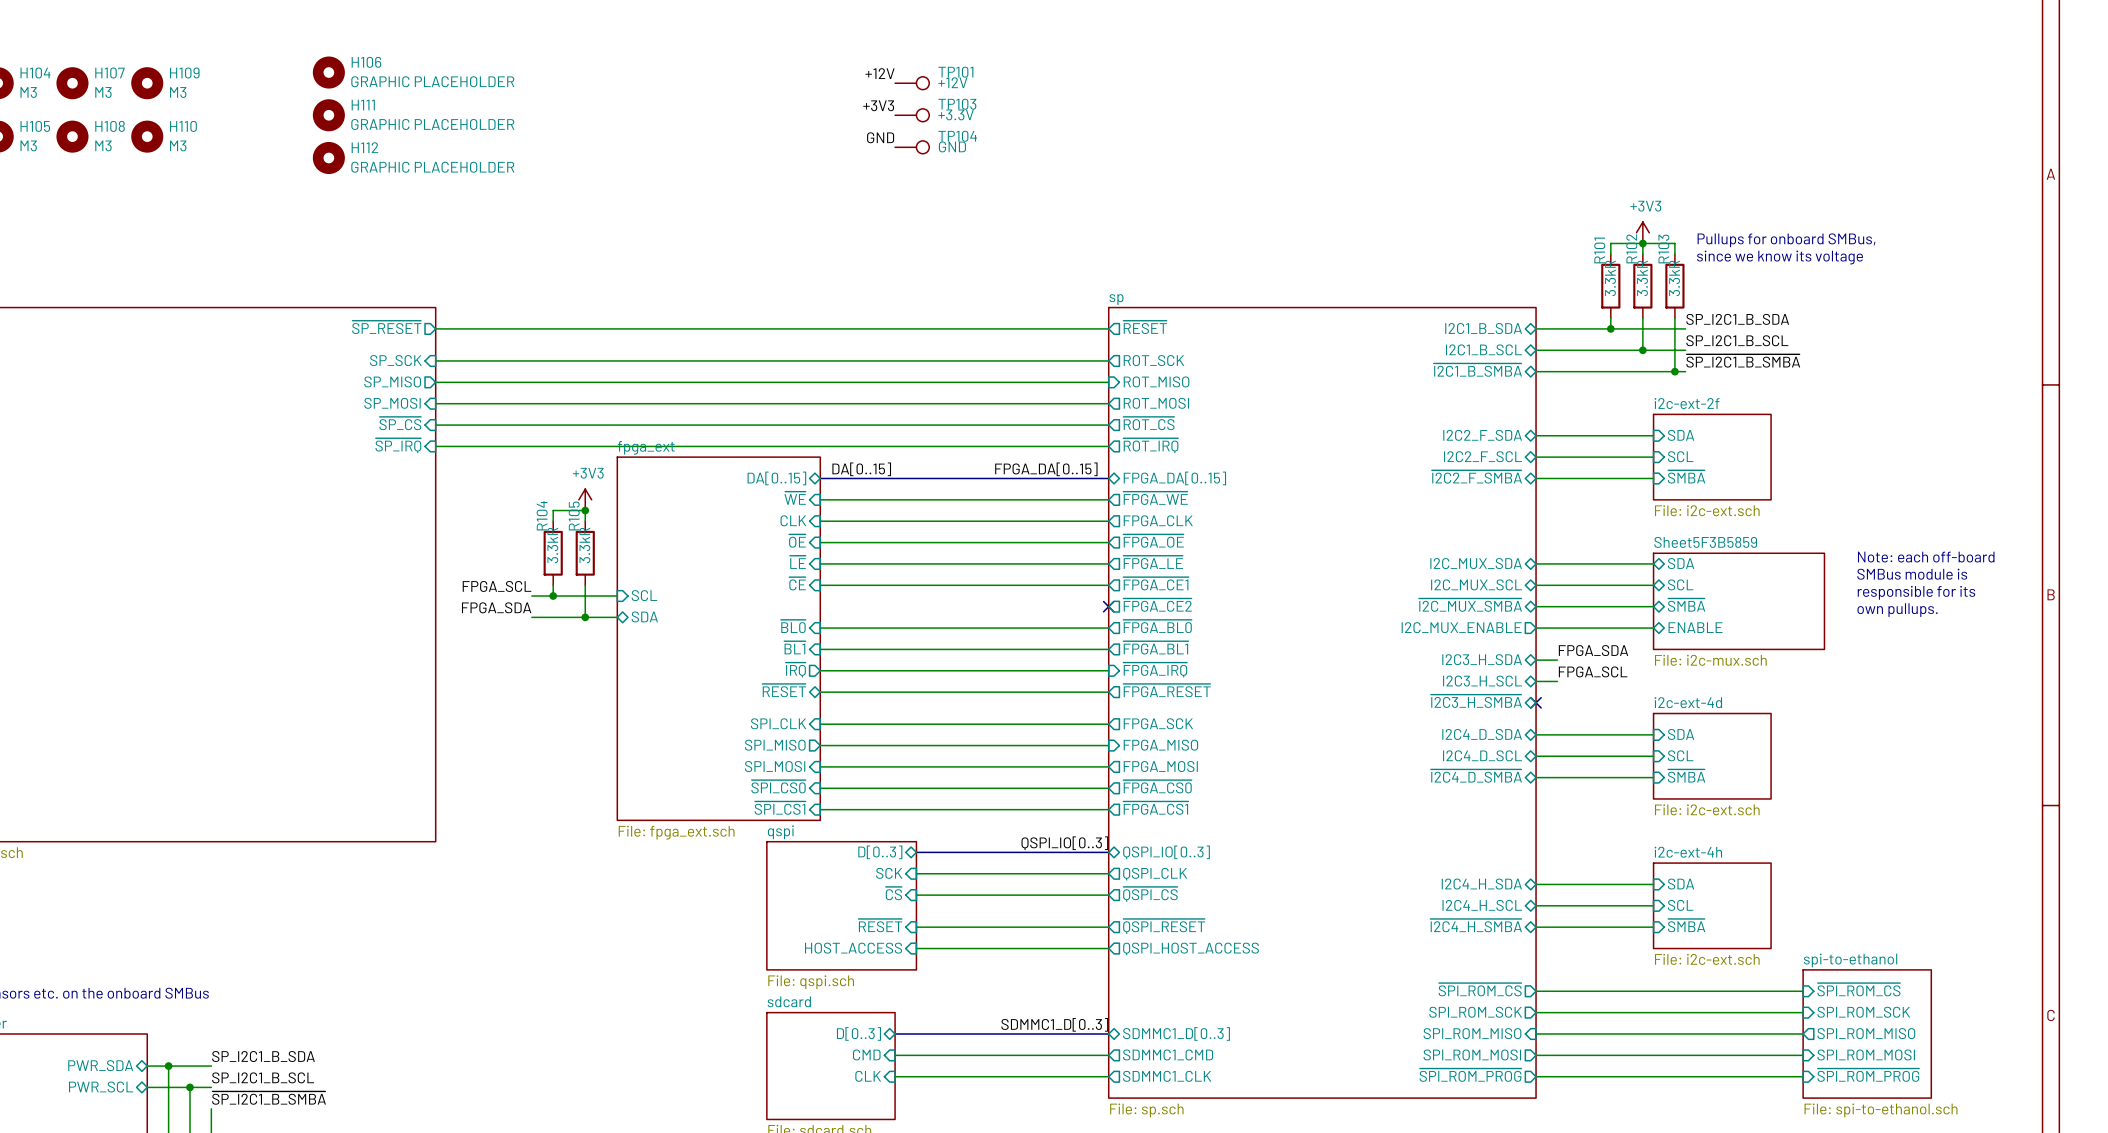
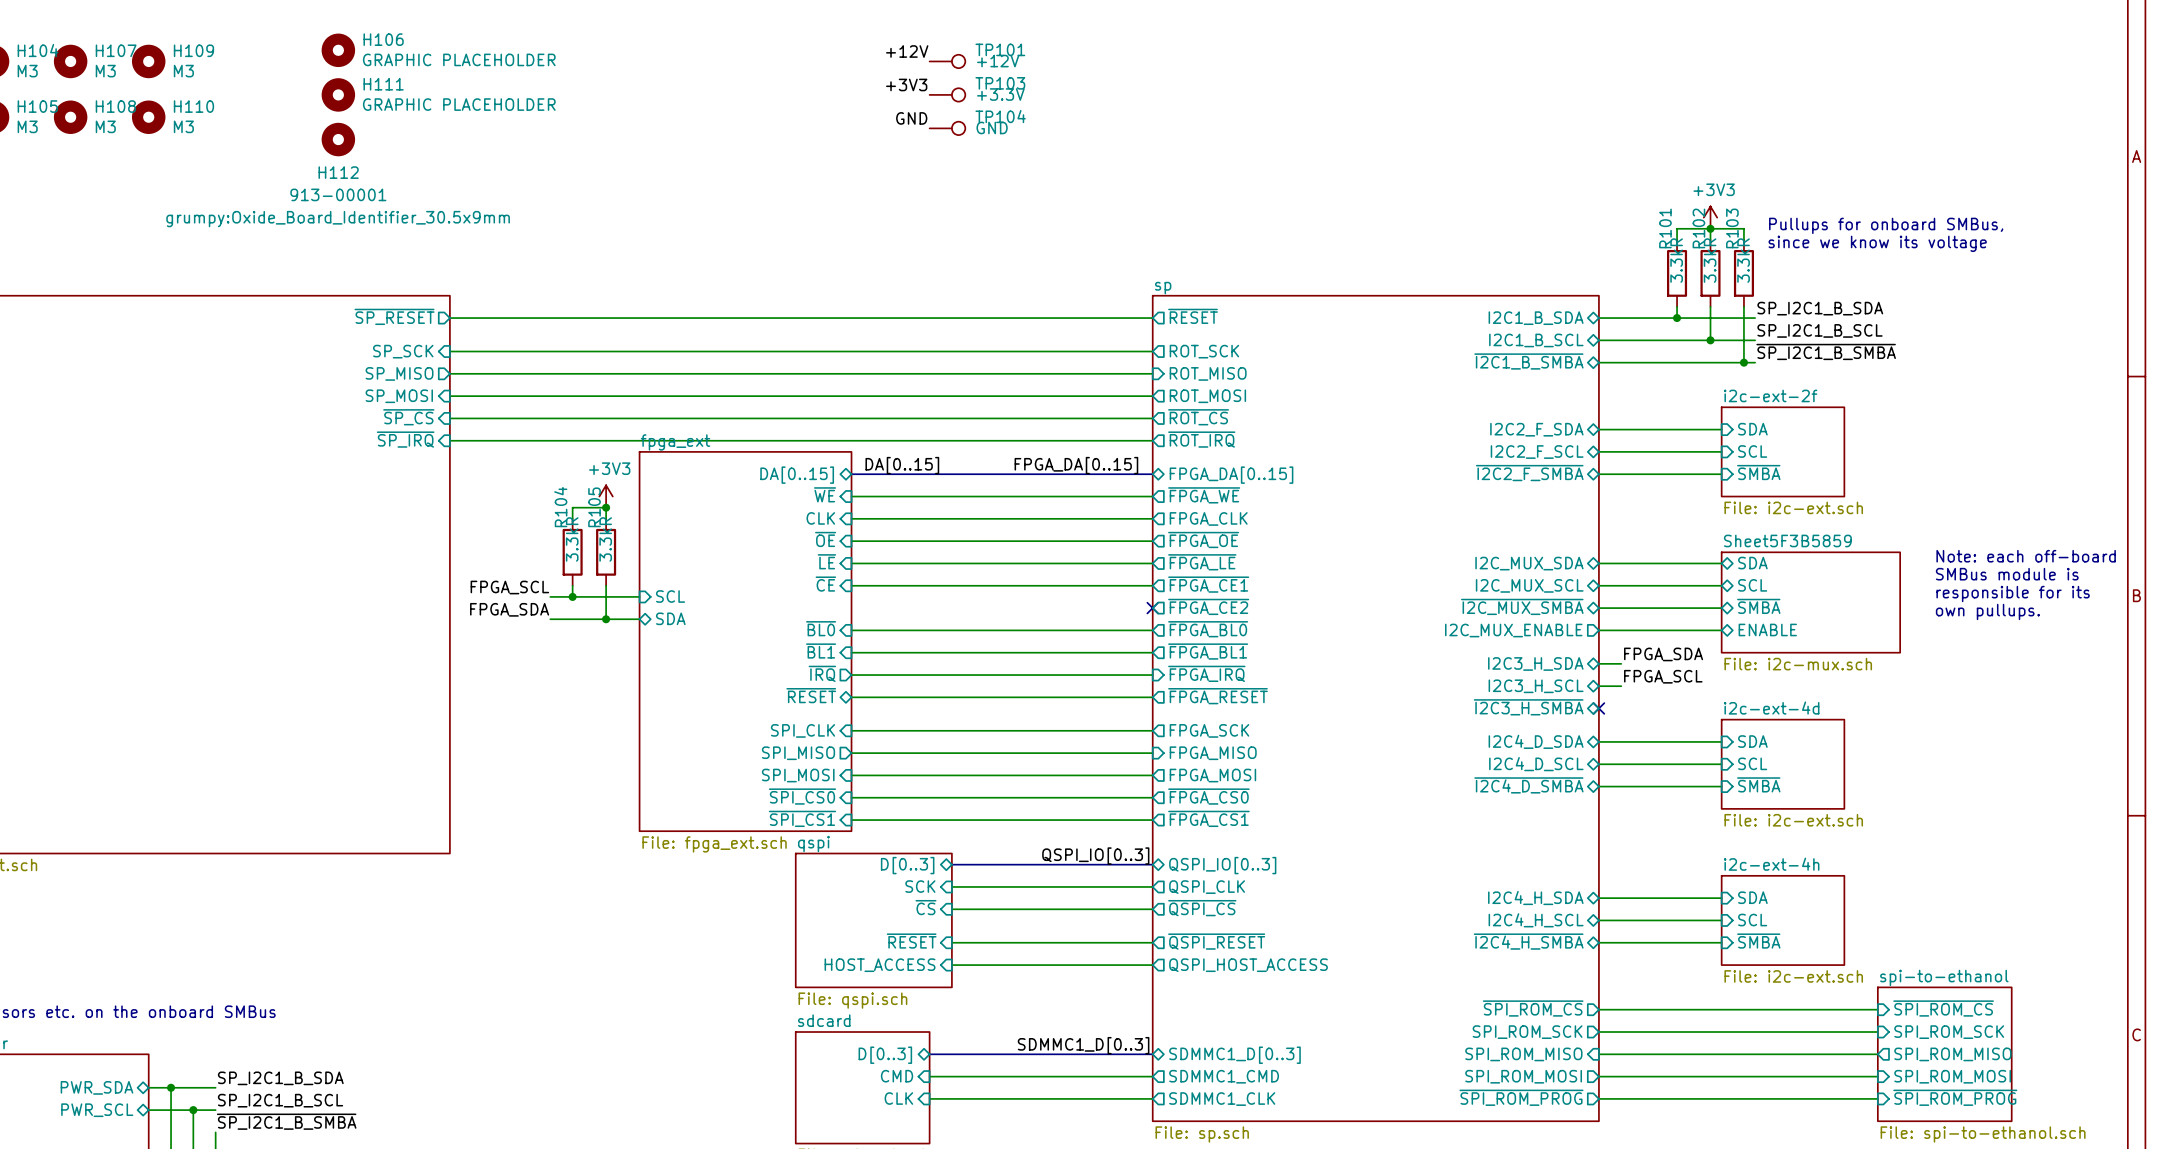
H112 name position: H112 (364, 147) -> H112 (338, 172)
H112 value: GRAPHIC PLACEHOLDER (432, 167) -> 913-00001 (338, 194)
H112 text: none -> grumpy:Oxide_Board_Identifier_30.5x9mm (338, 219)

